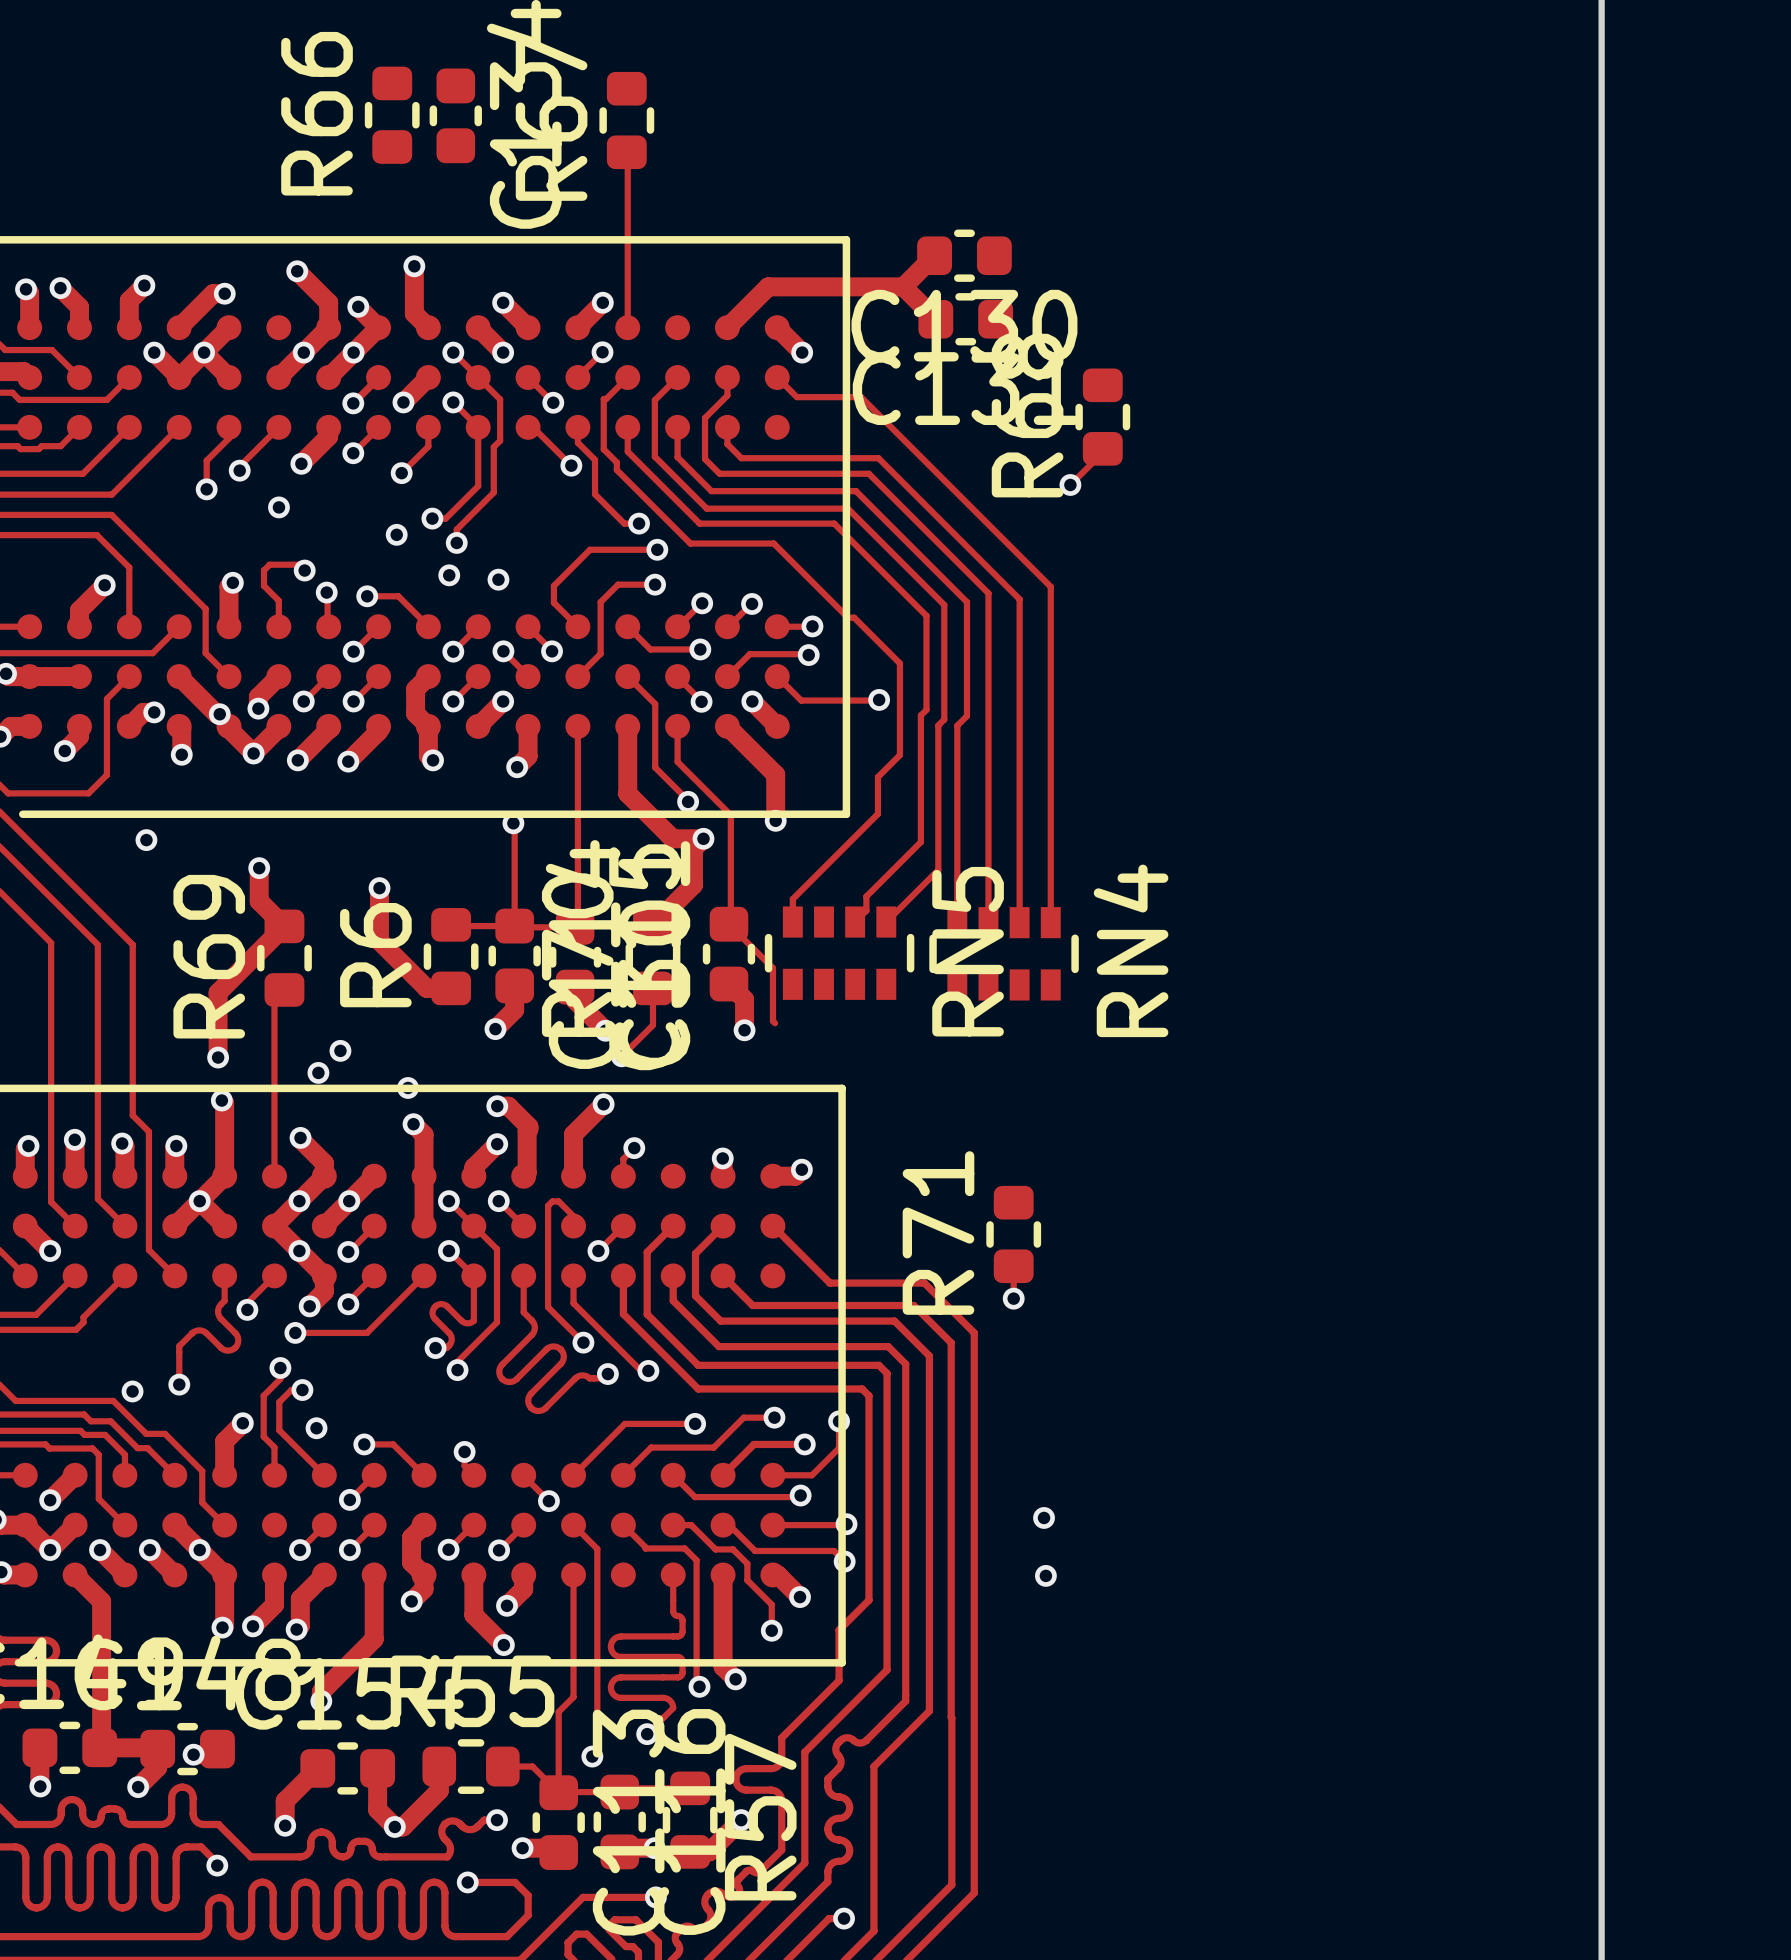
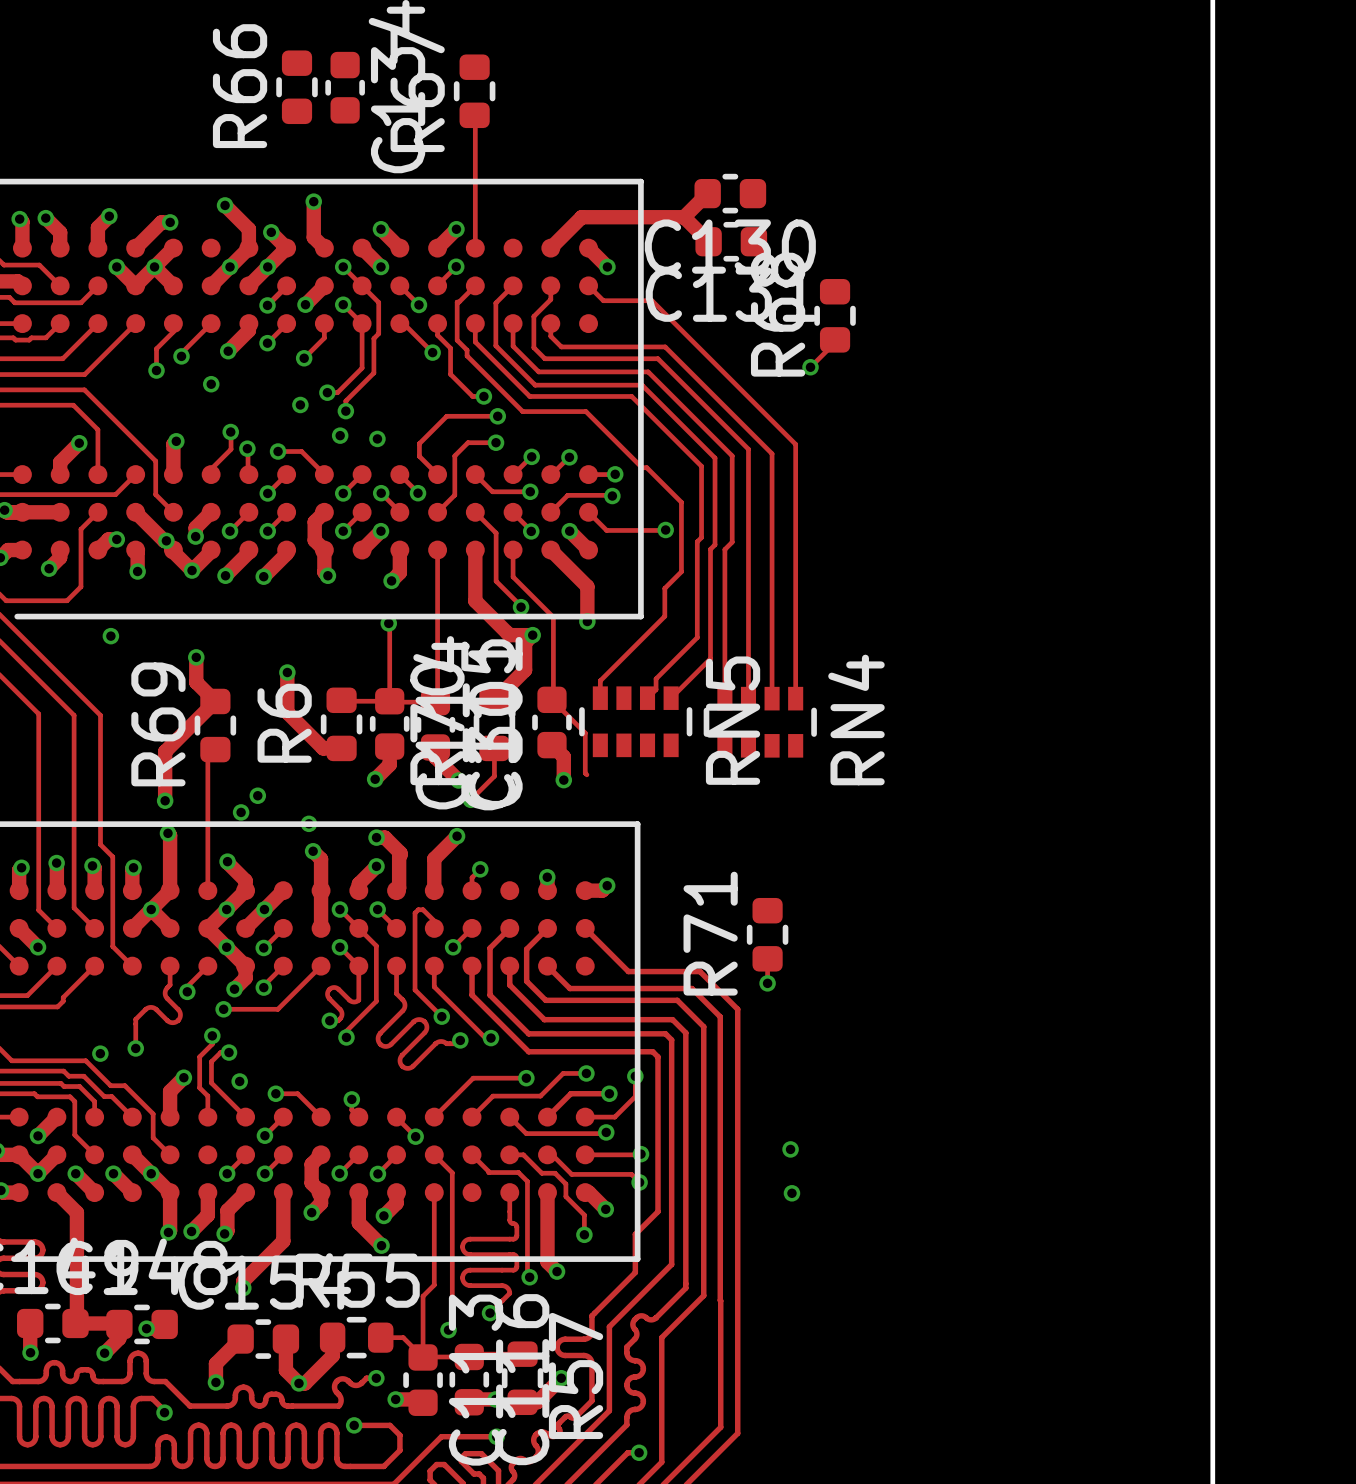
track: (304, 570) (298, 564) (269, 564) (264, 570) (264, 585) (278, 600) (278, 619) -> (231, 435) (231, 449) (211, 469)

